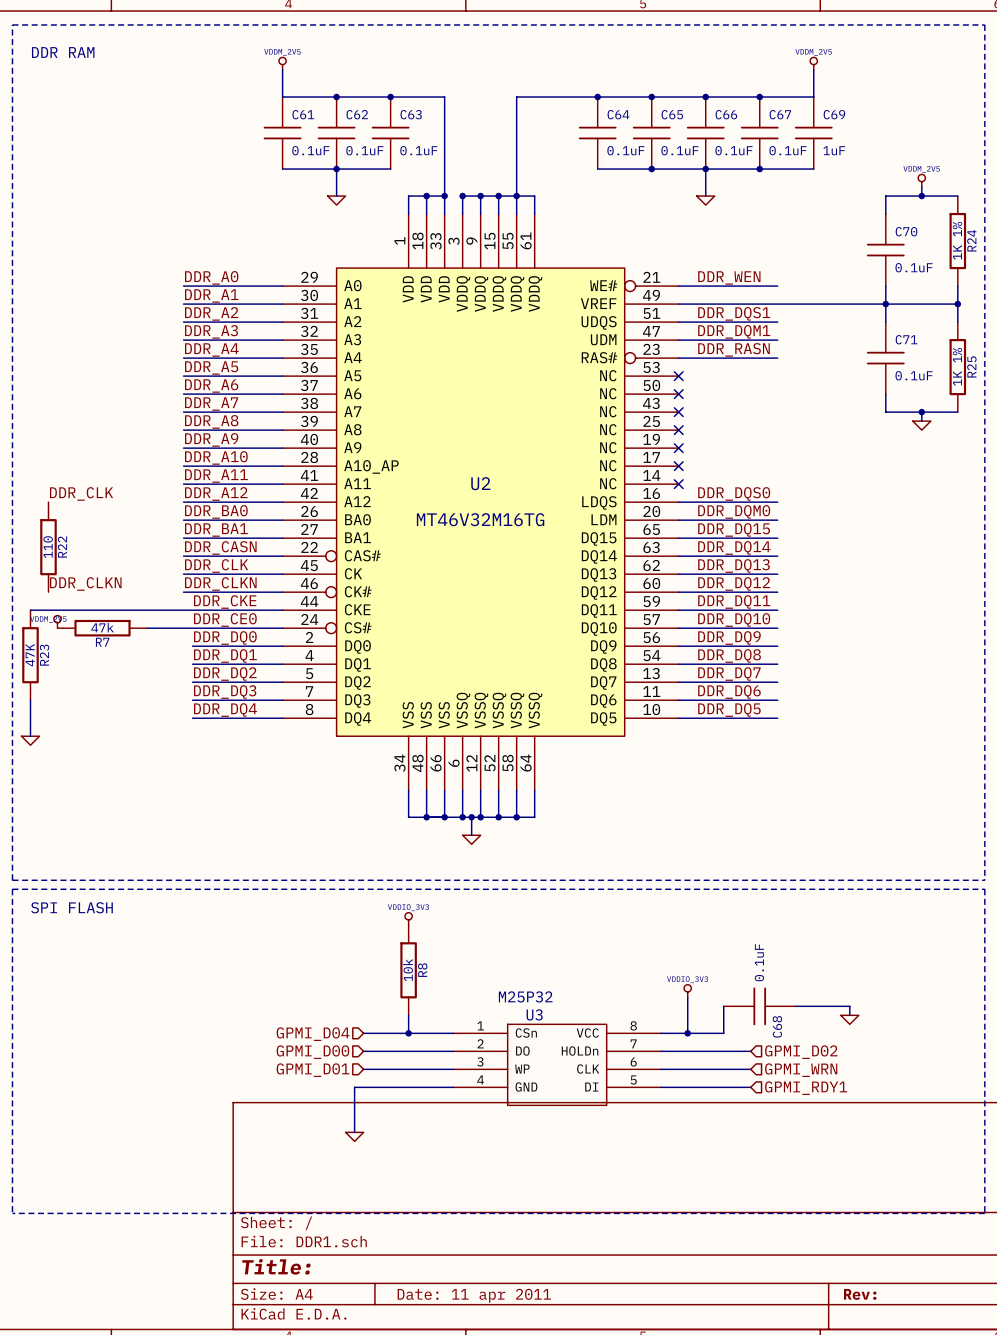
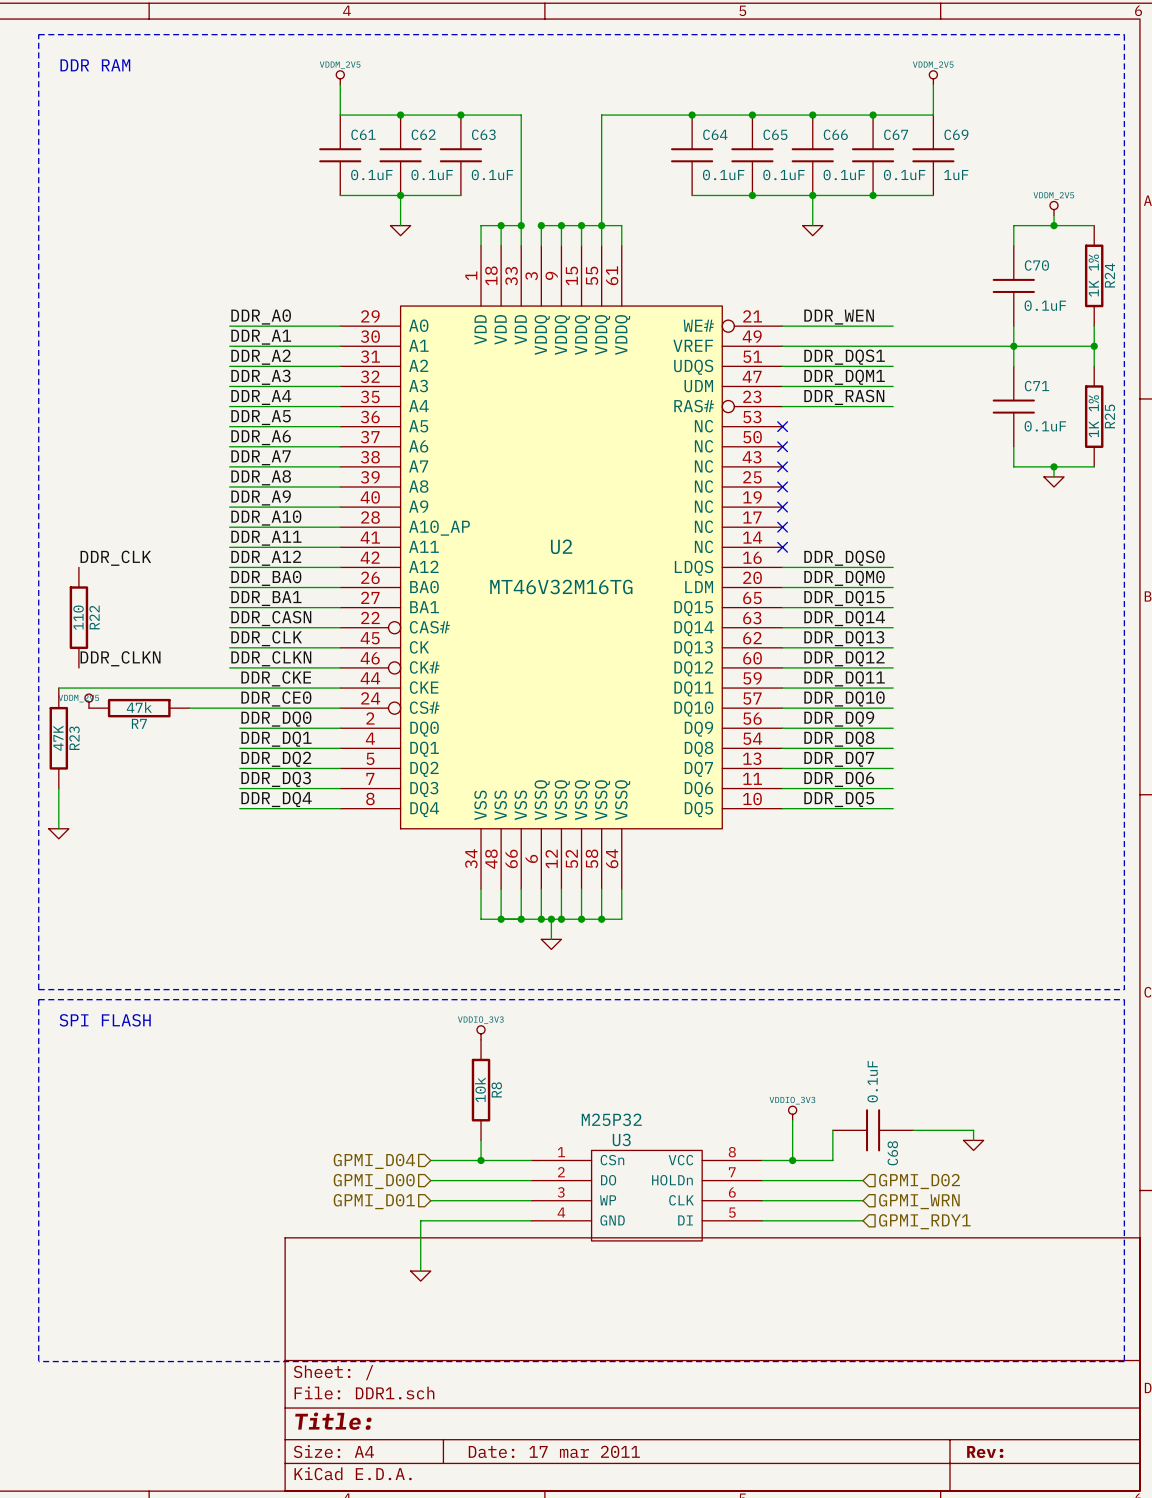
title block: Date: 11 apr 2011 (474, 1295) -> Date: 17 mar 2011 (554, 1451)

